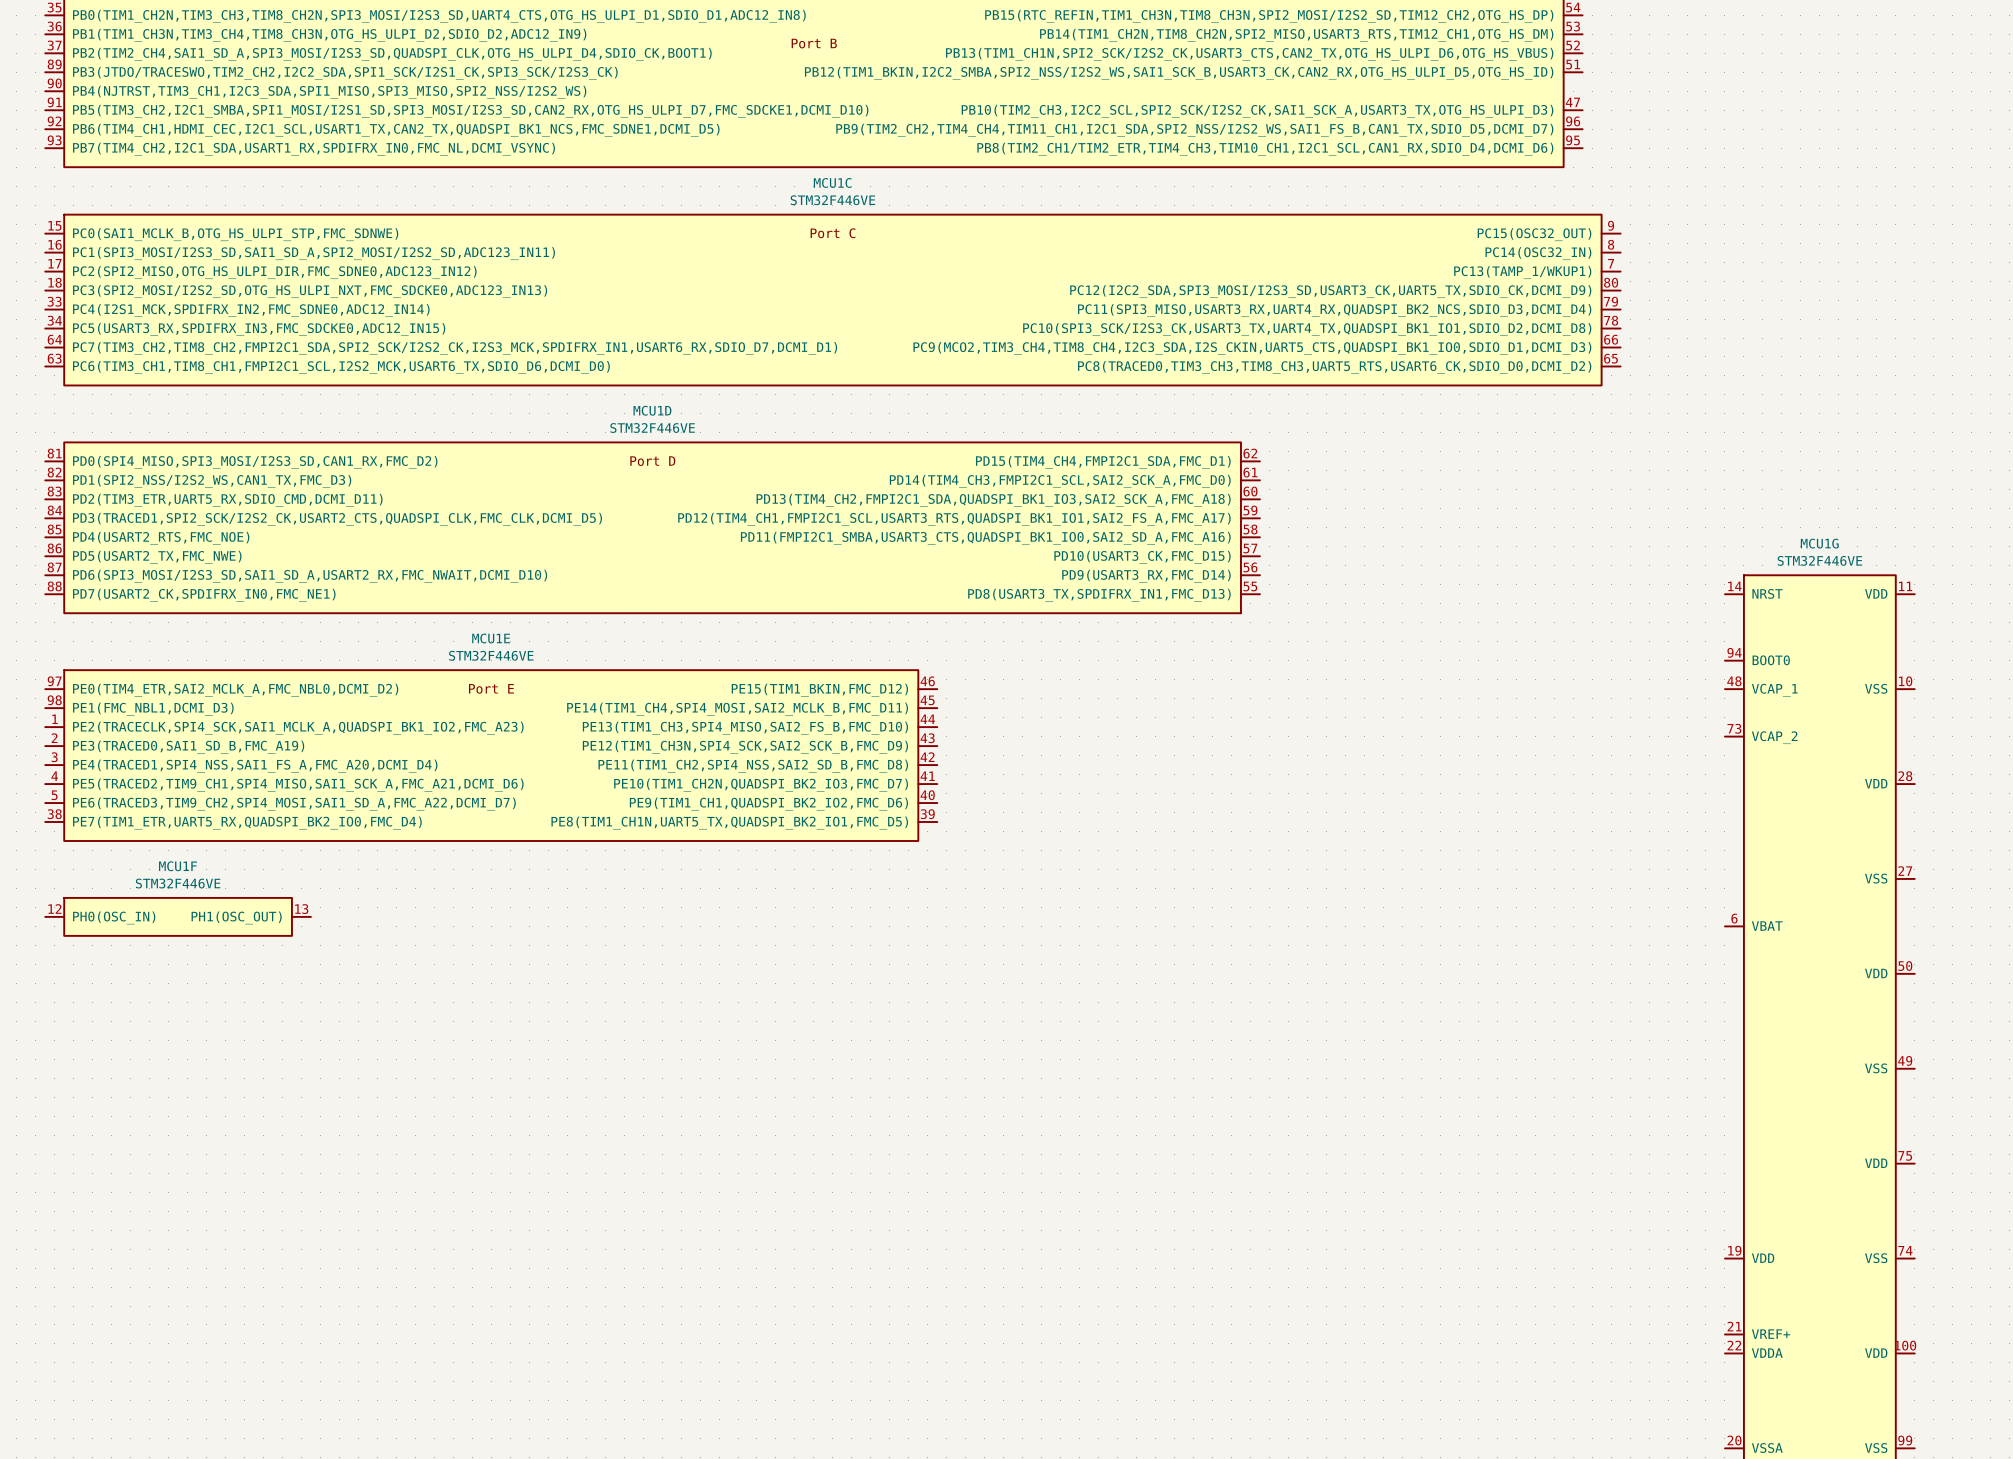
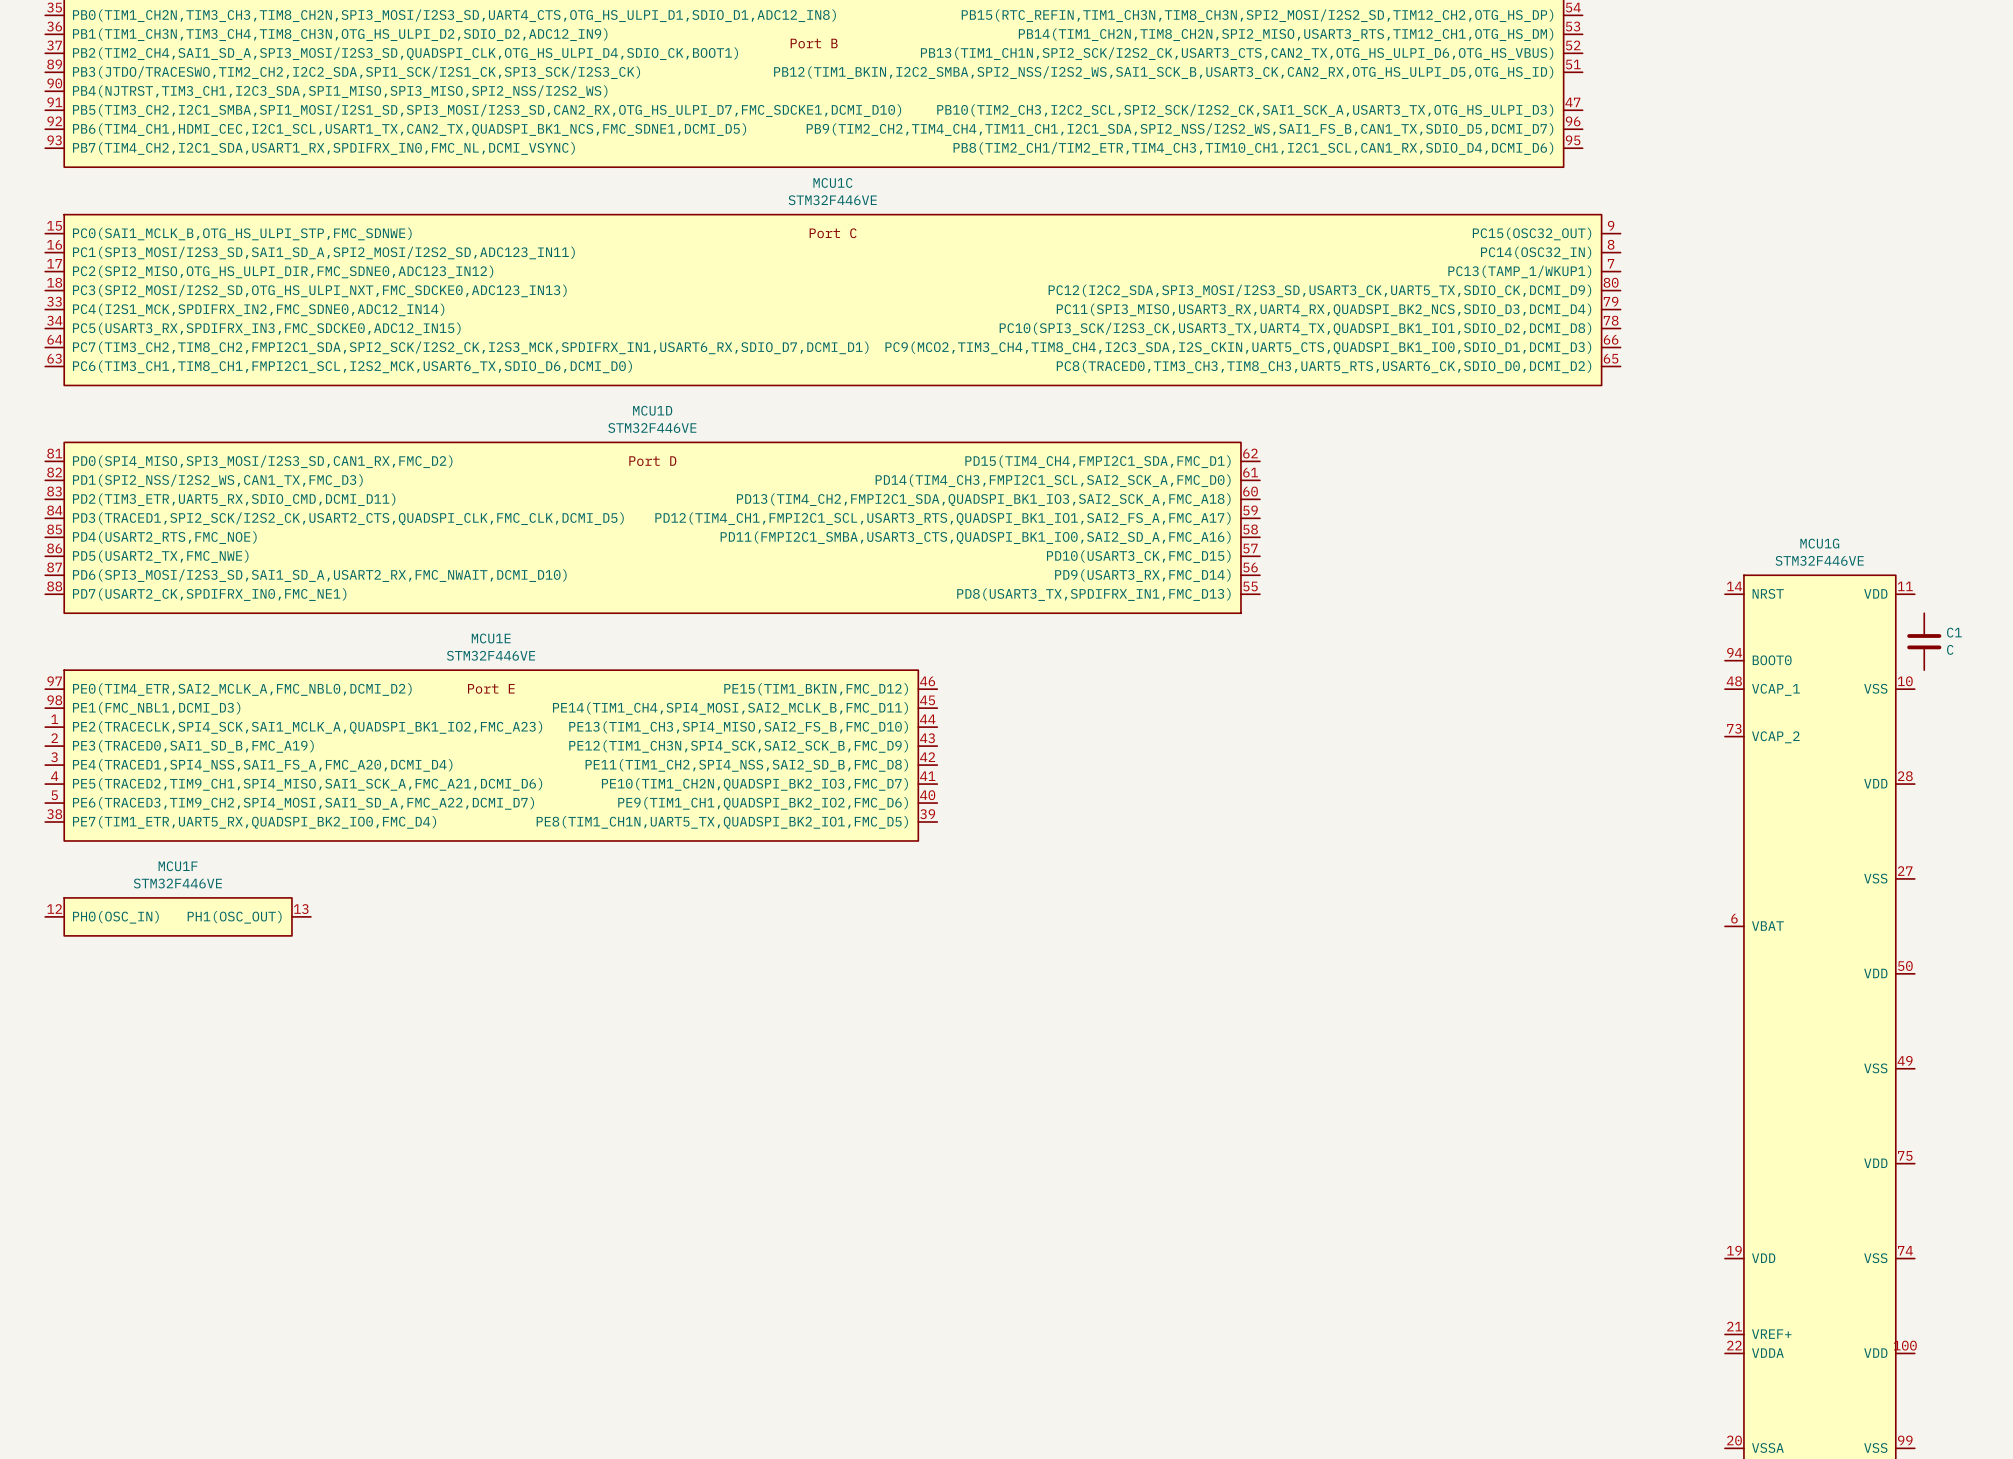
C1: none -> C (1924, 641)

